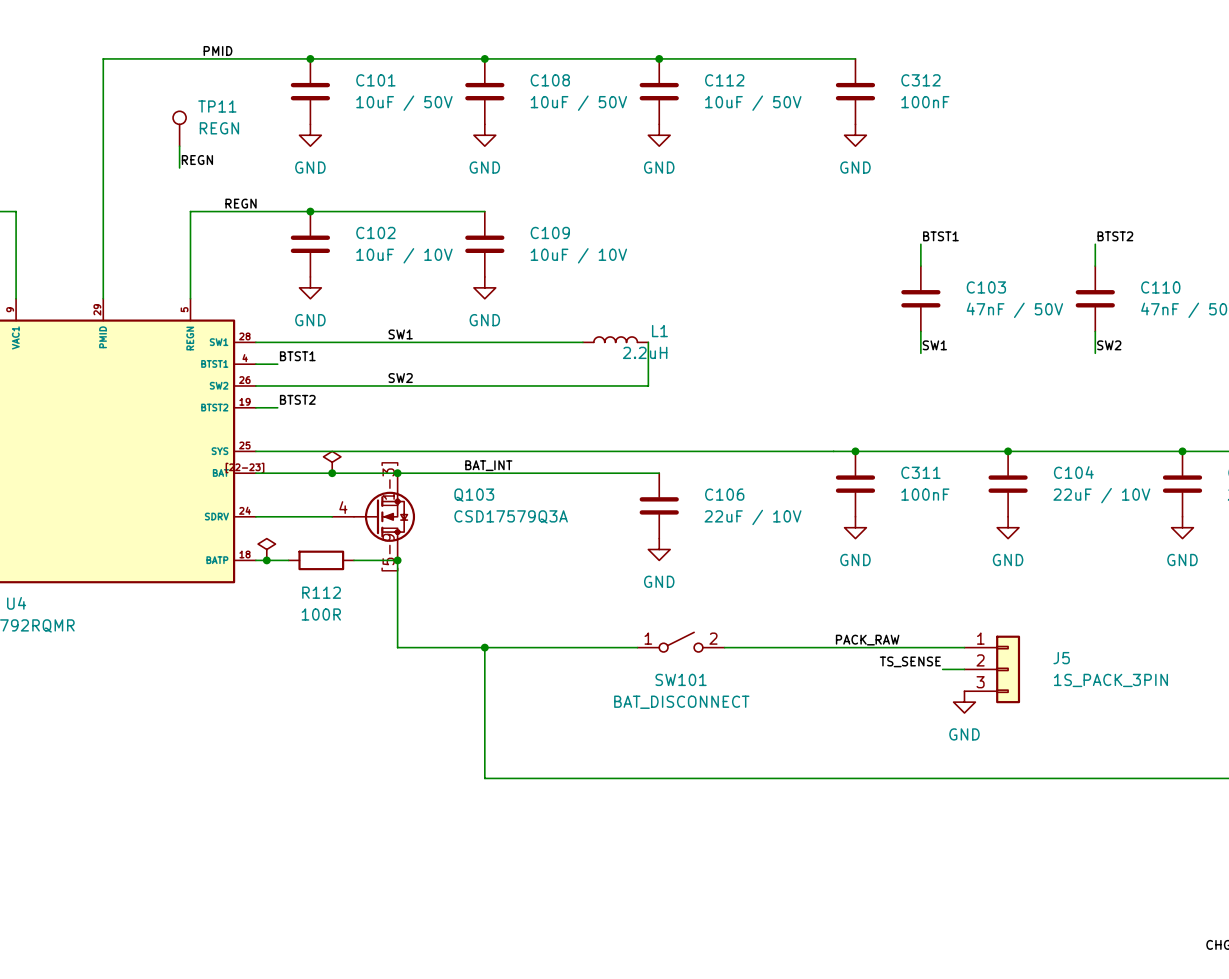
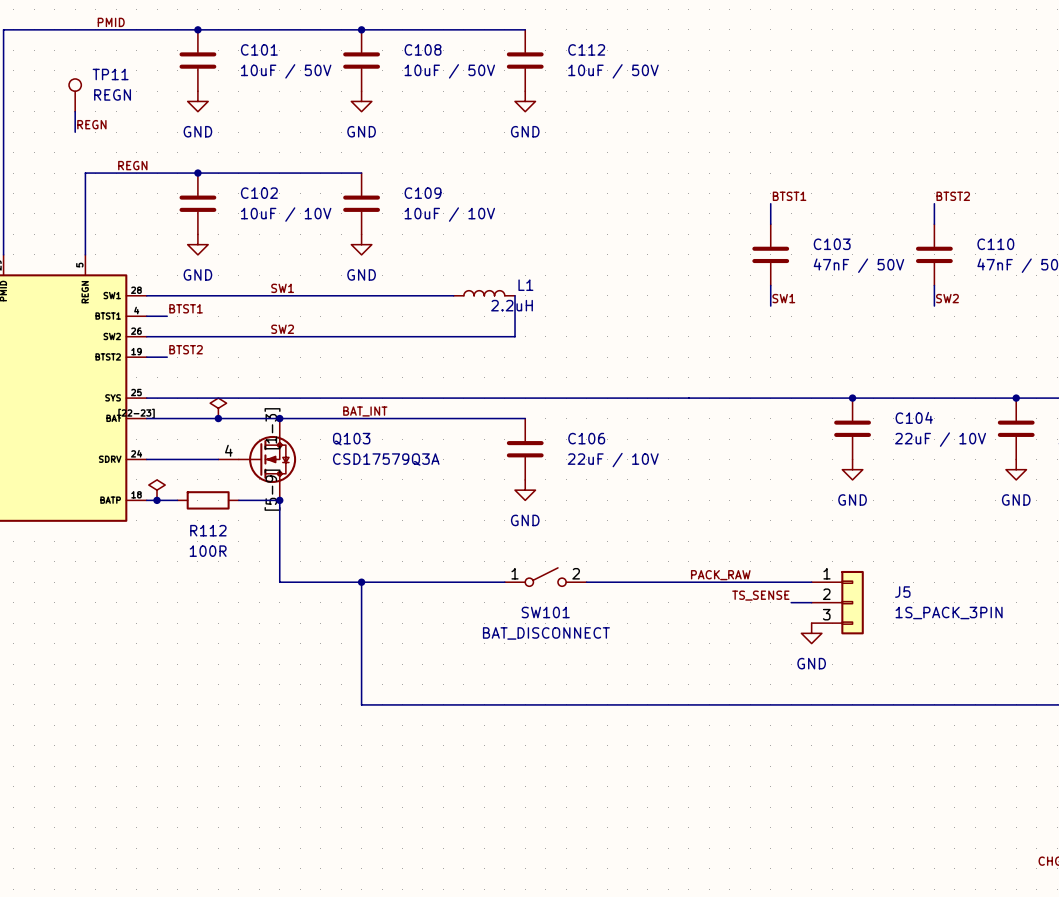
wire: (659, 58) (855, 58) -> none
junction: (659, 58) -> none
C312: 100nF (855, 91) -> none
power symbol: GND (855, 135) -> none
junction: (855, 451) -> none
C311: 100nF (855, 484) -> none
power symbol: GND (855, 527) -> none

